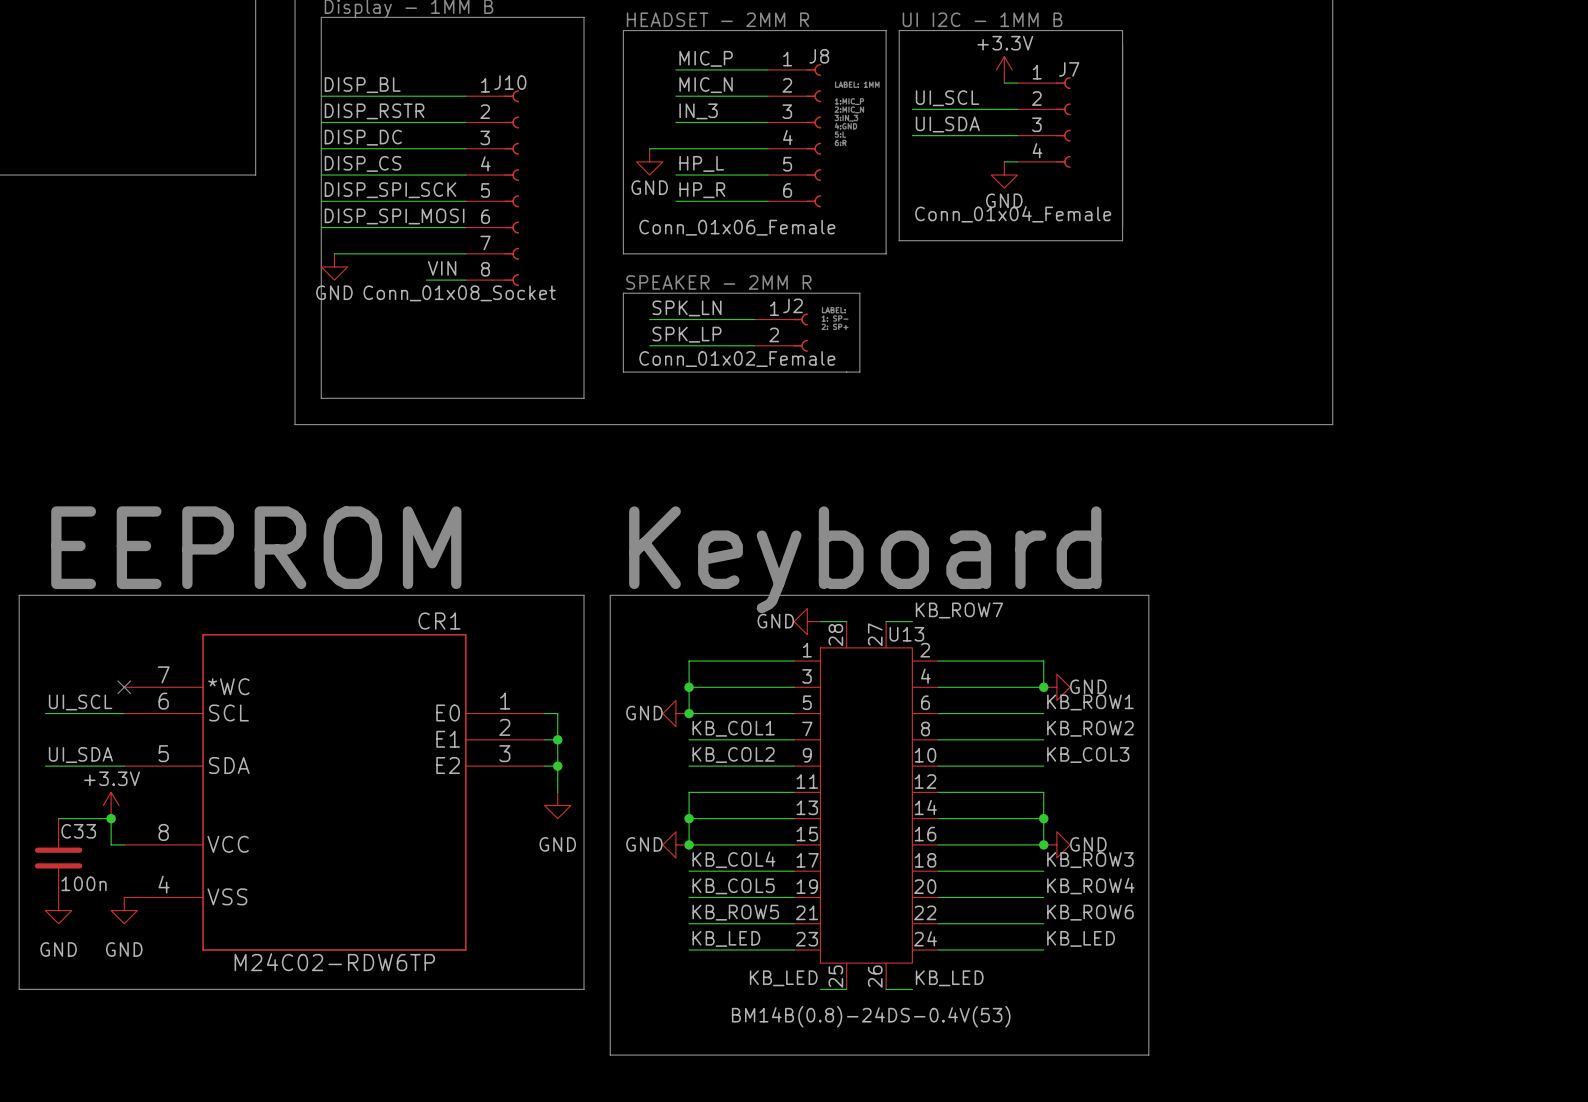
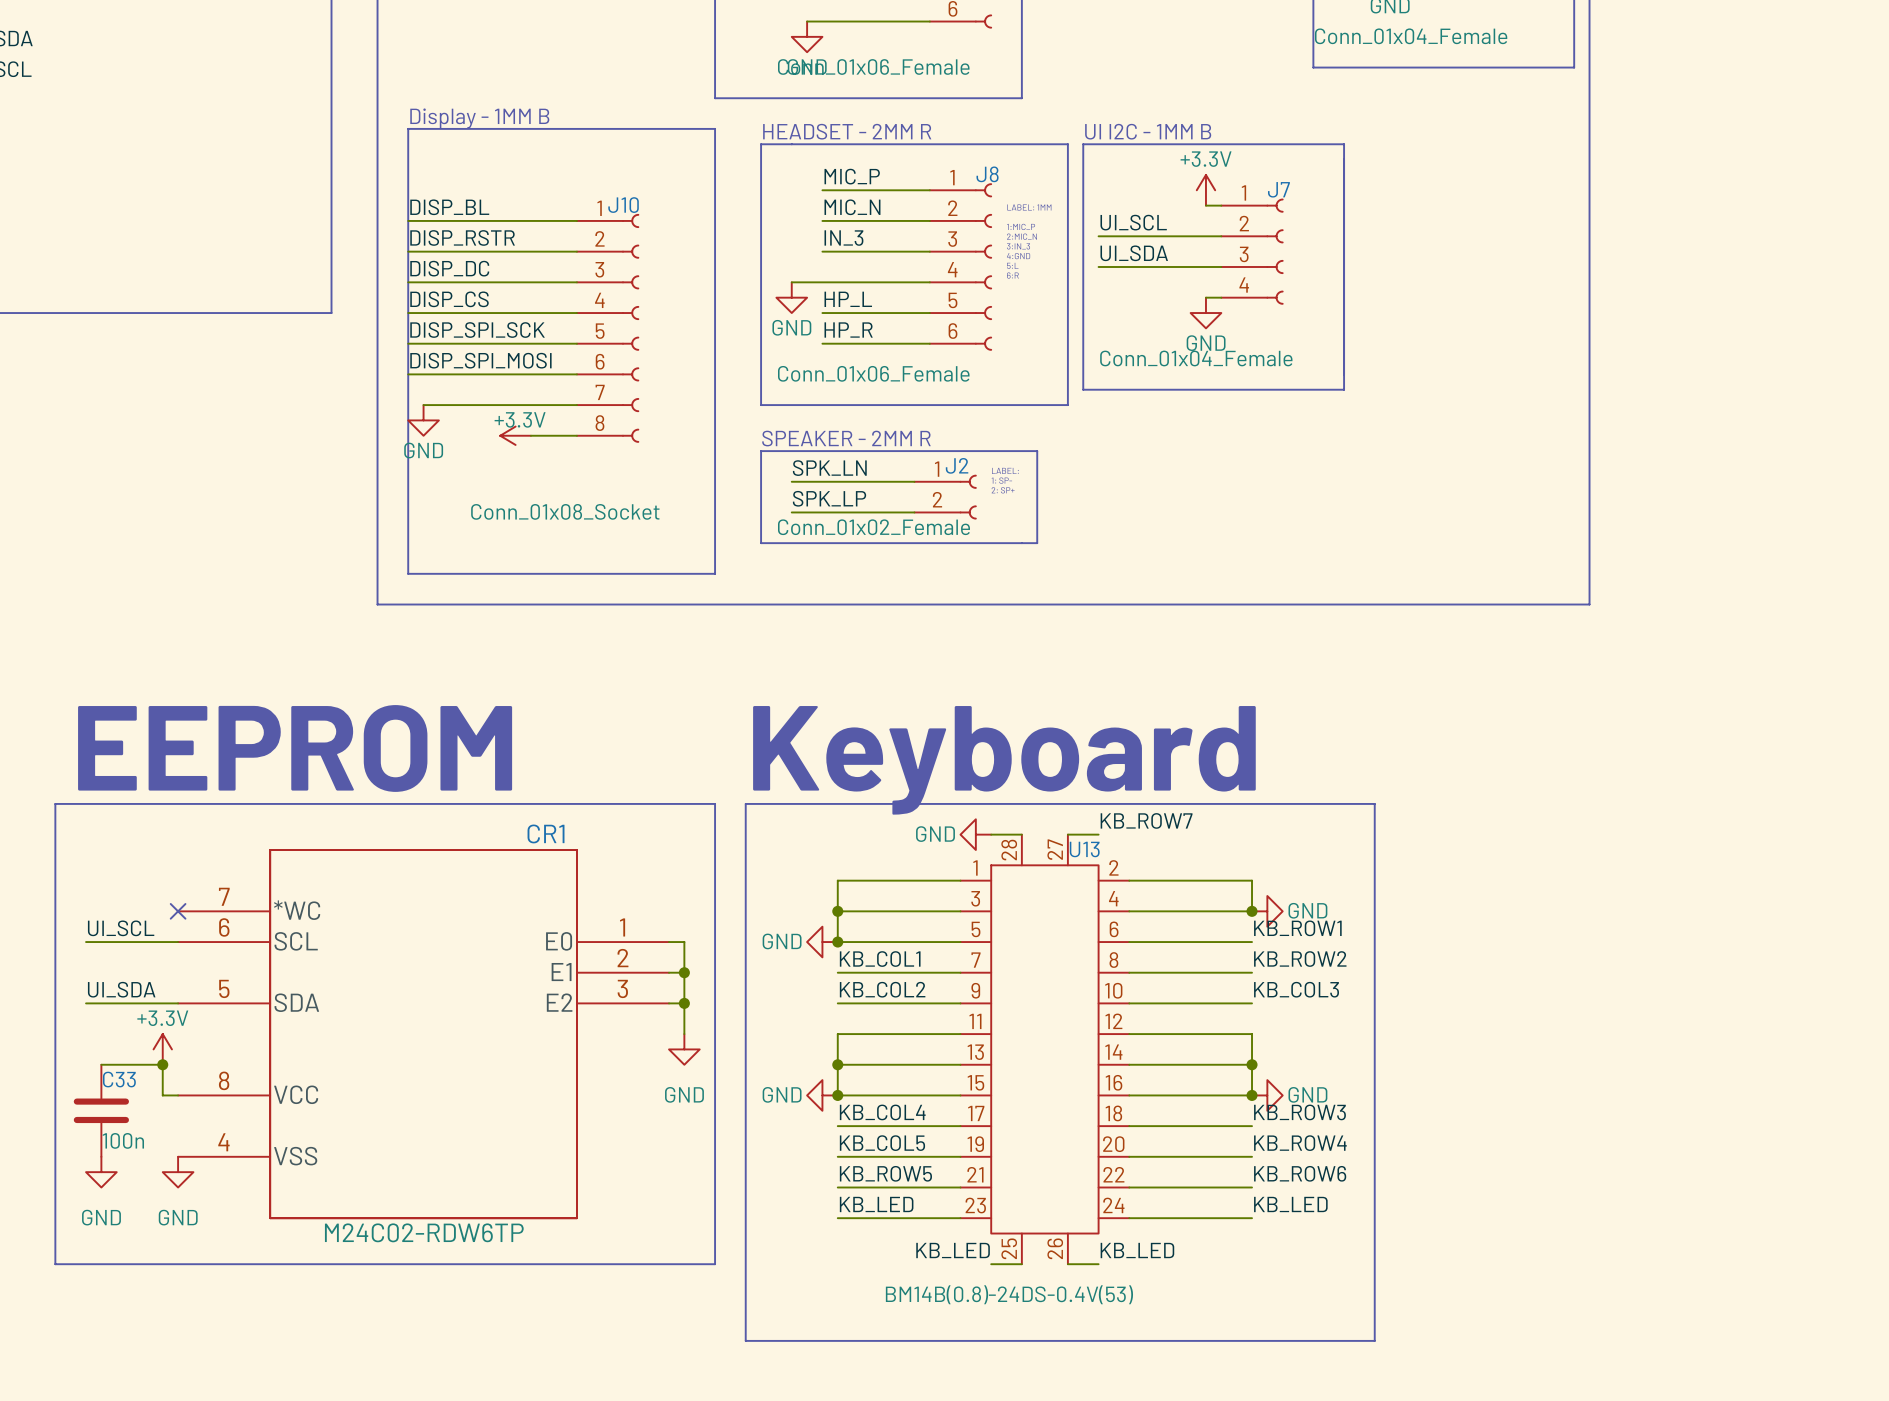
label: VIN (442, 268) -> none
power symbol: none -> +3.3V (515, 435)
J10 value position: Conn_01x08_Socket (459, 293) -> Conn_01x08_Socket (565, 511)

